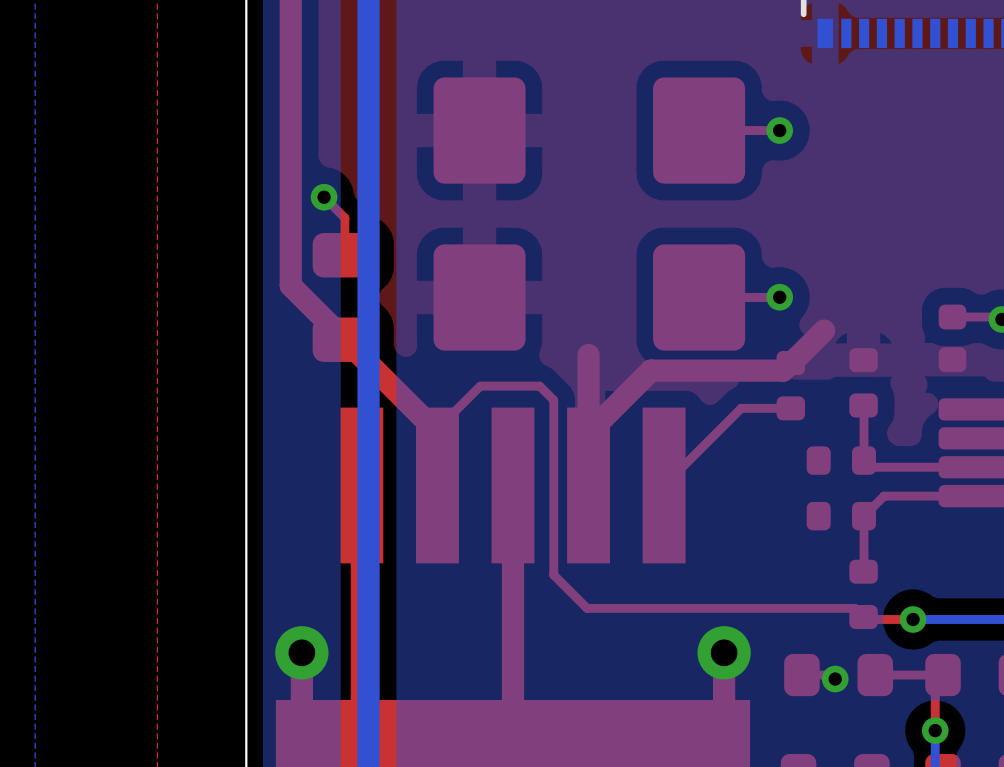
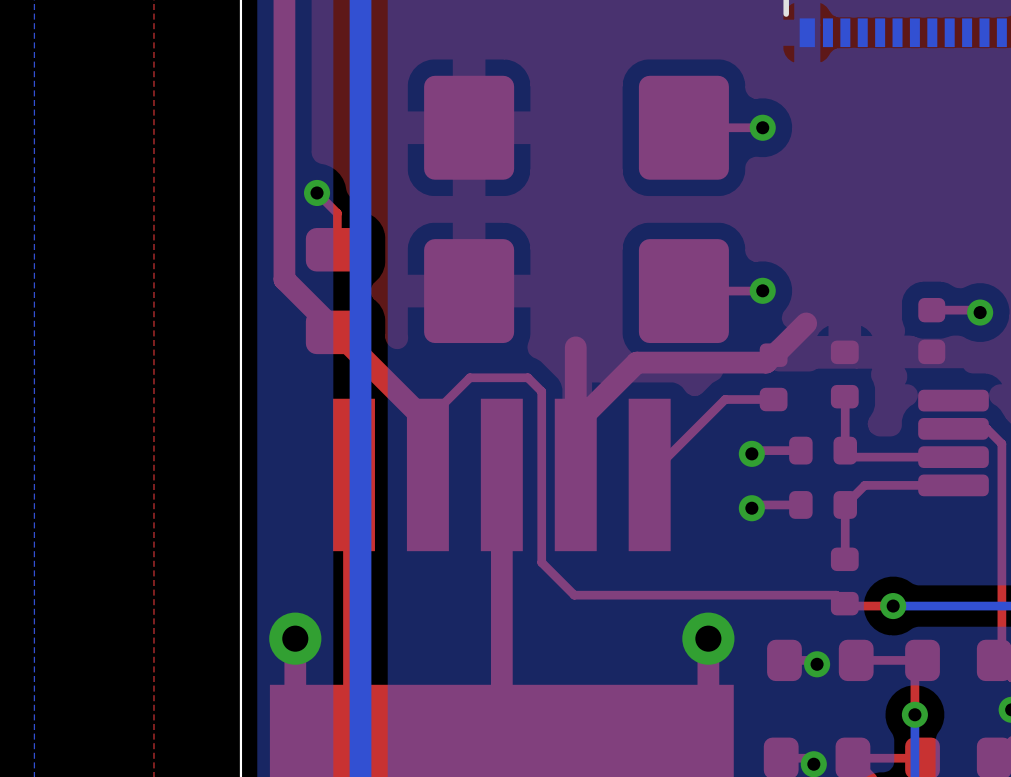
top track: none -> (800, 450) (755, 450) (751, 453)
via: none -> (751, 453)
top track: none -> (800, 504) (755, 504) (751, 508)
via: none -> (751, 508)

